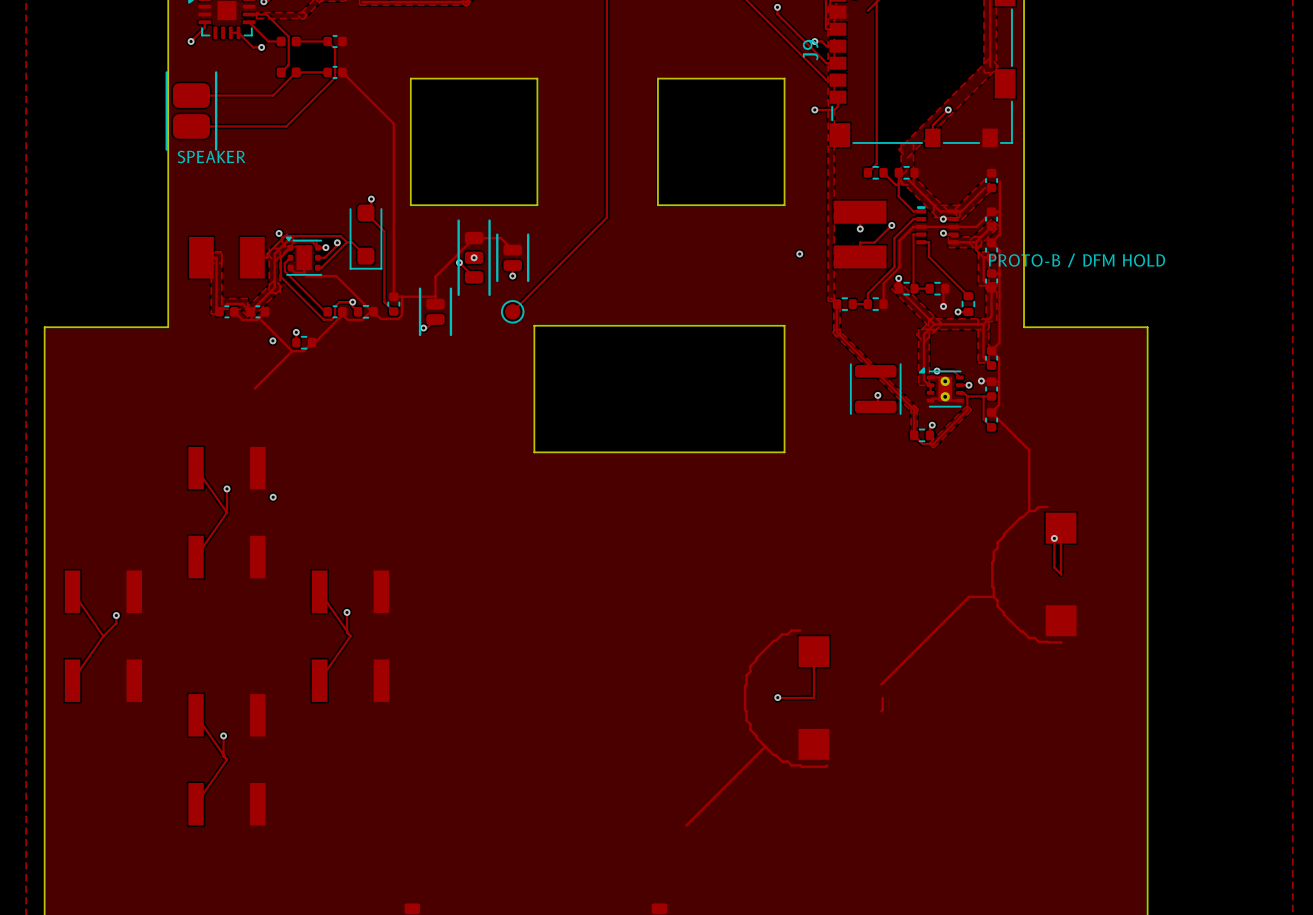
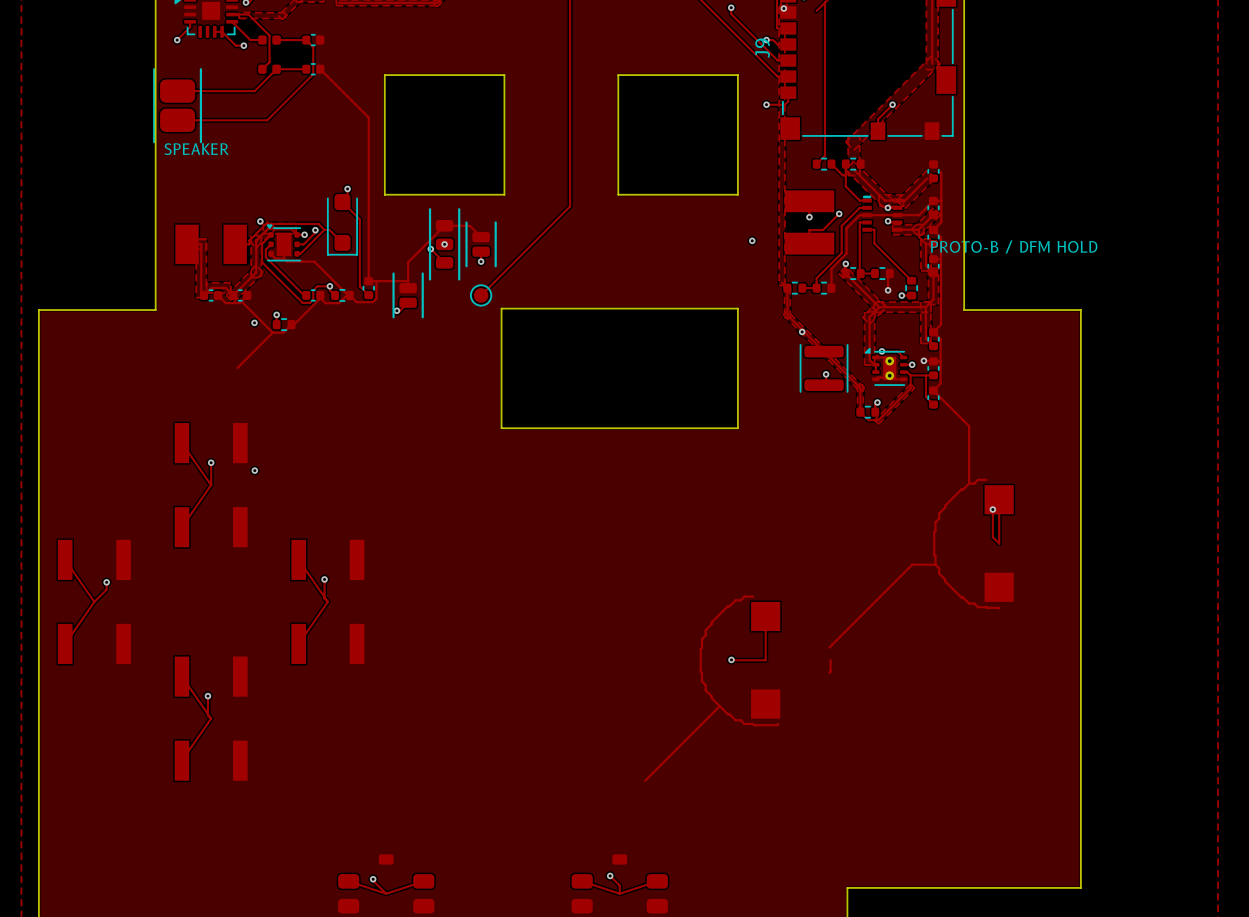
via: none -> (783, 8)
via: none -> (802, 331)

